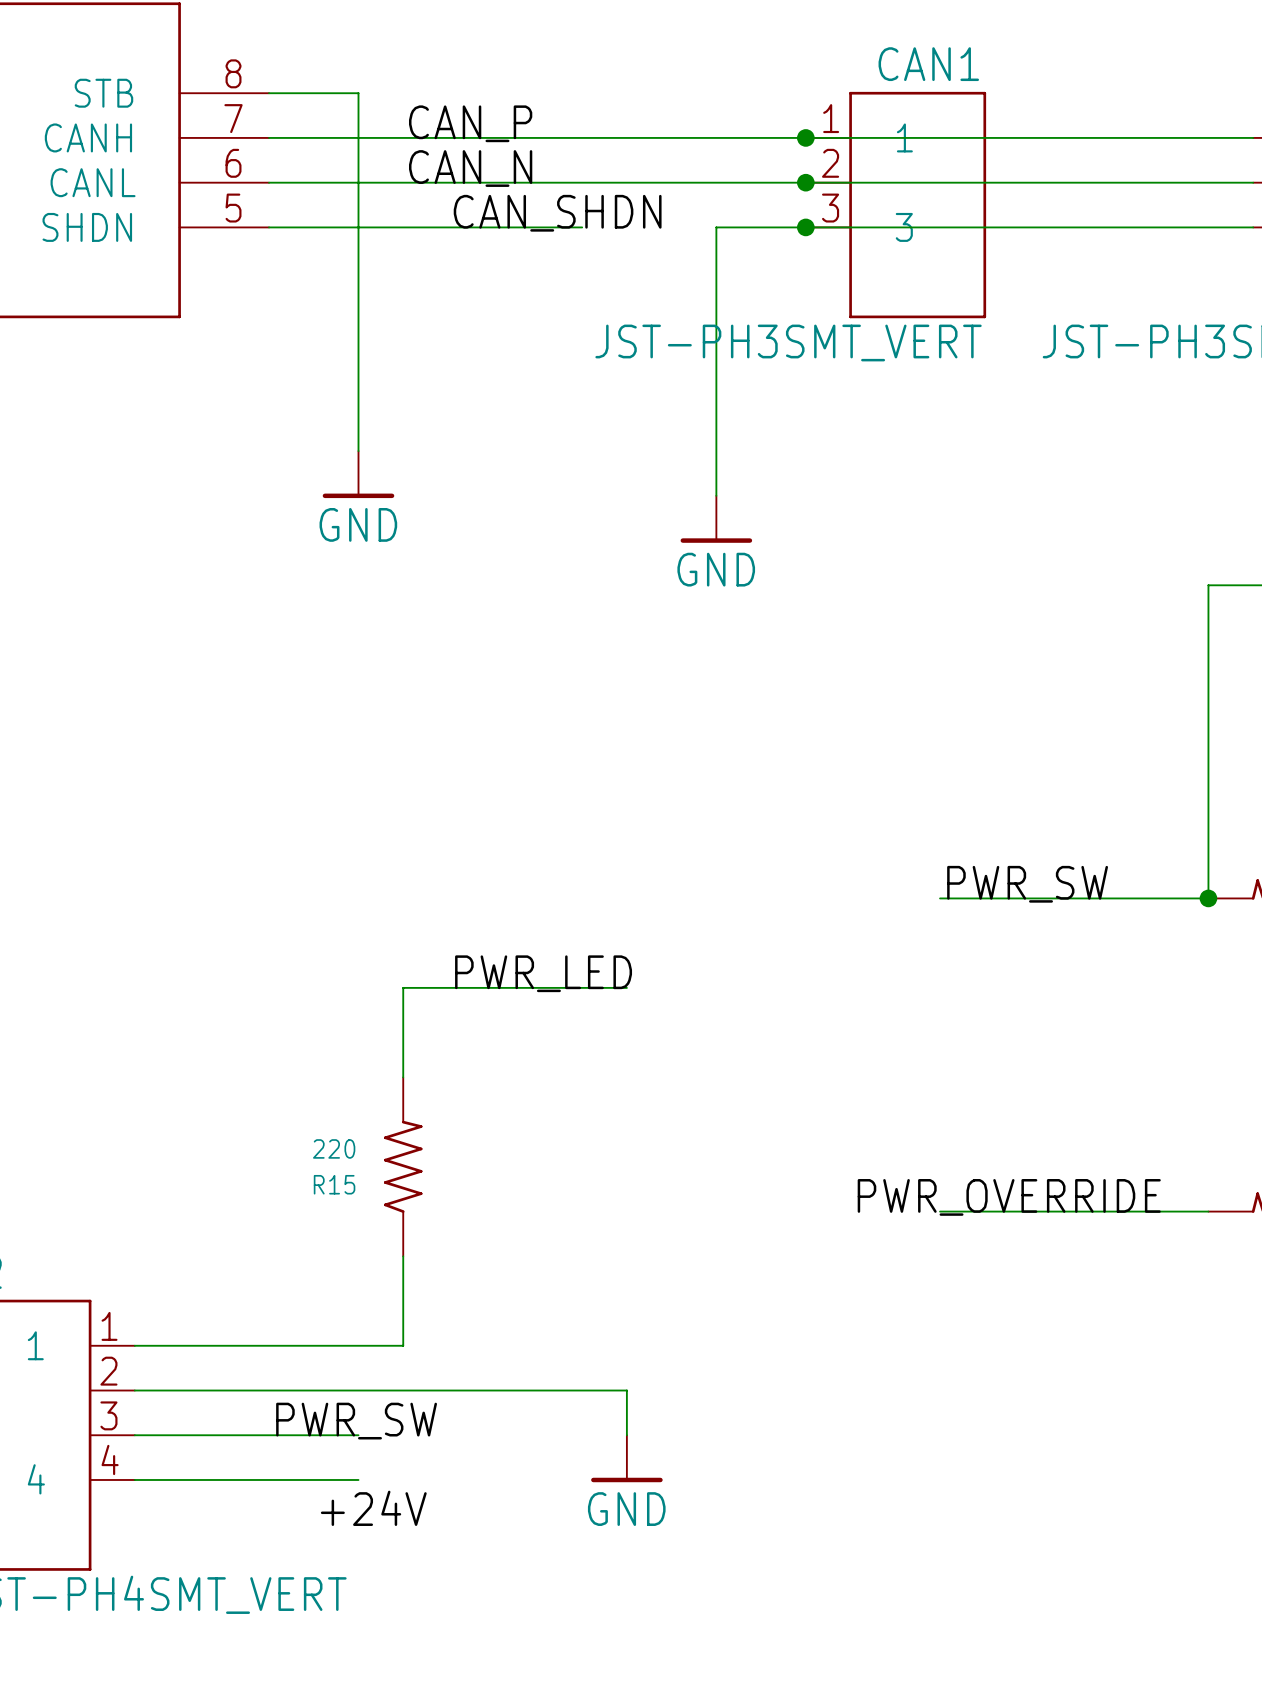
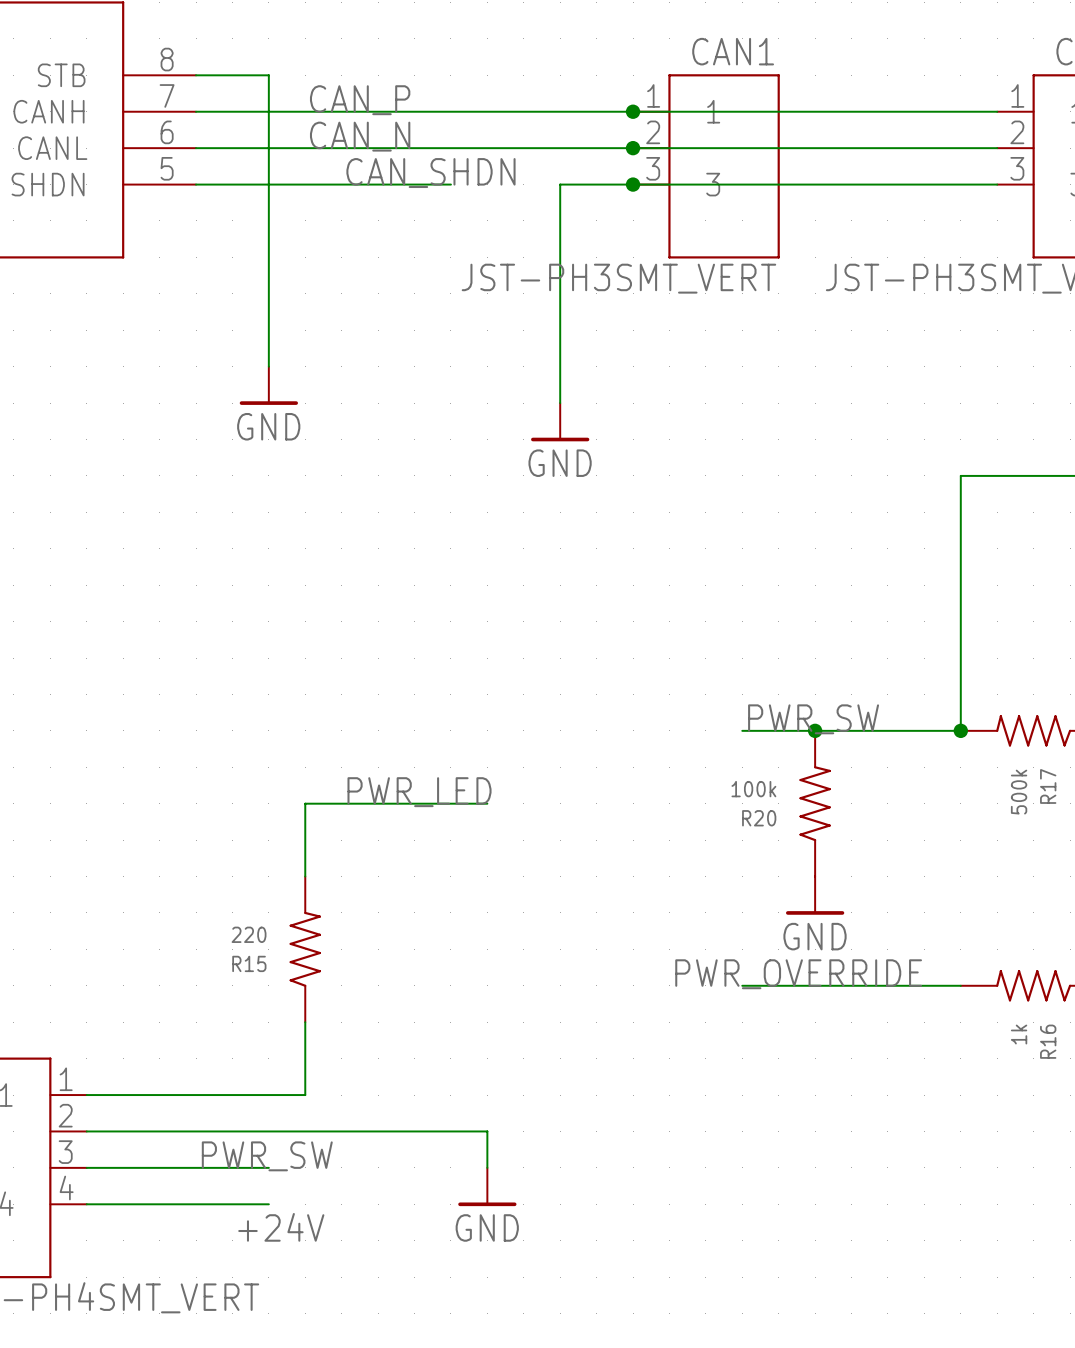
junction: none -> (815, 730)
R20: none -> 100k (815, 803)
power symbol: none -> GND (815, 895)

